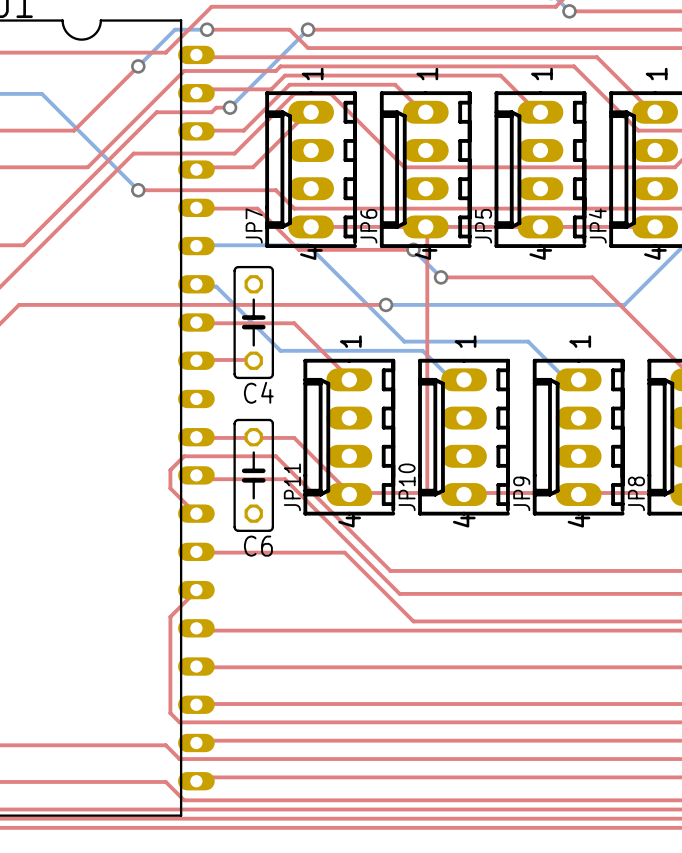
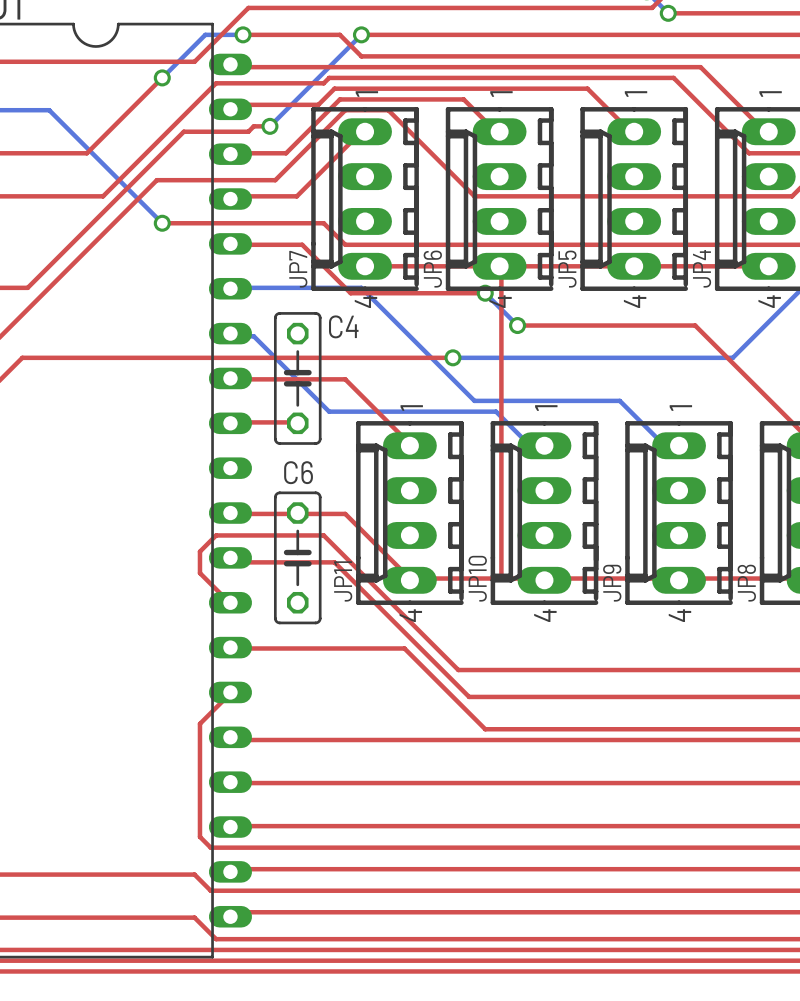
C4 name position: C4 (258, 392) -> C4 (343, 326)
C6 name position: C6 (258, 546) -> C6 (298, 472)

